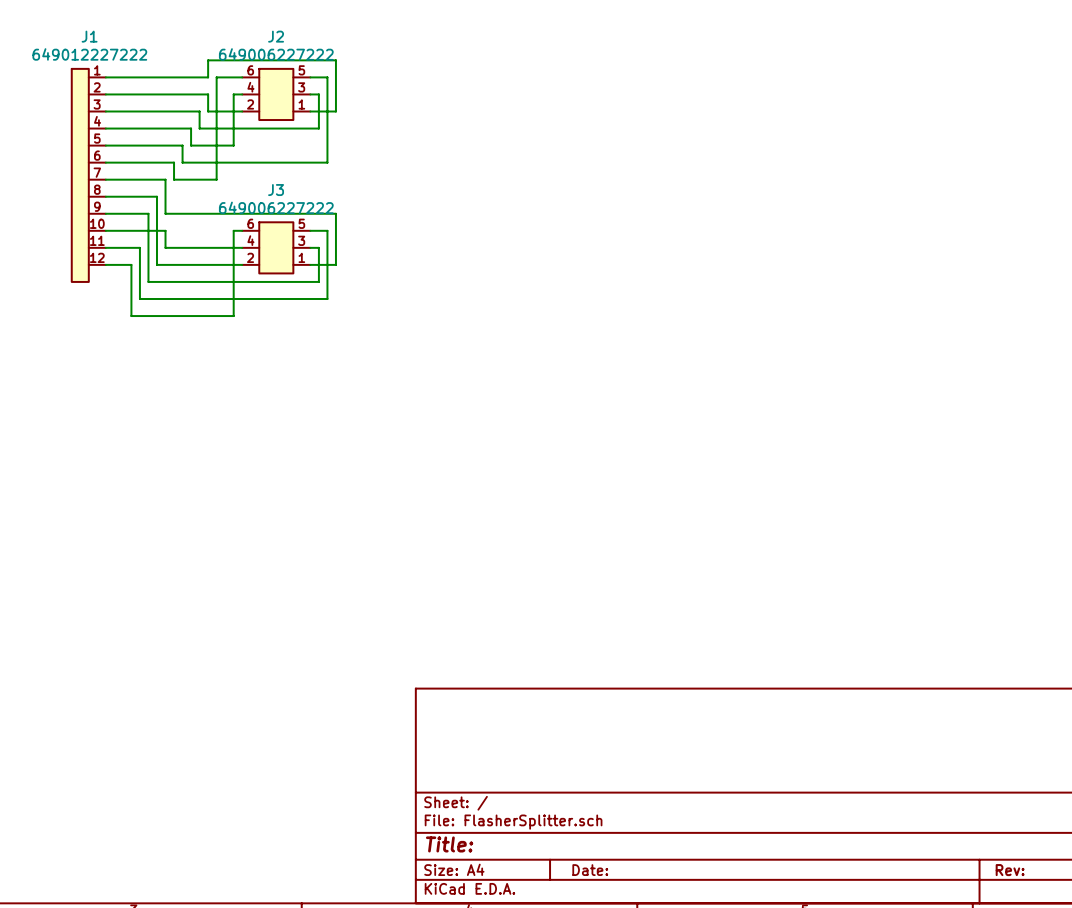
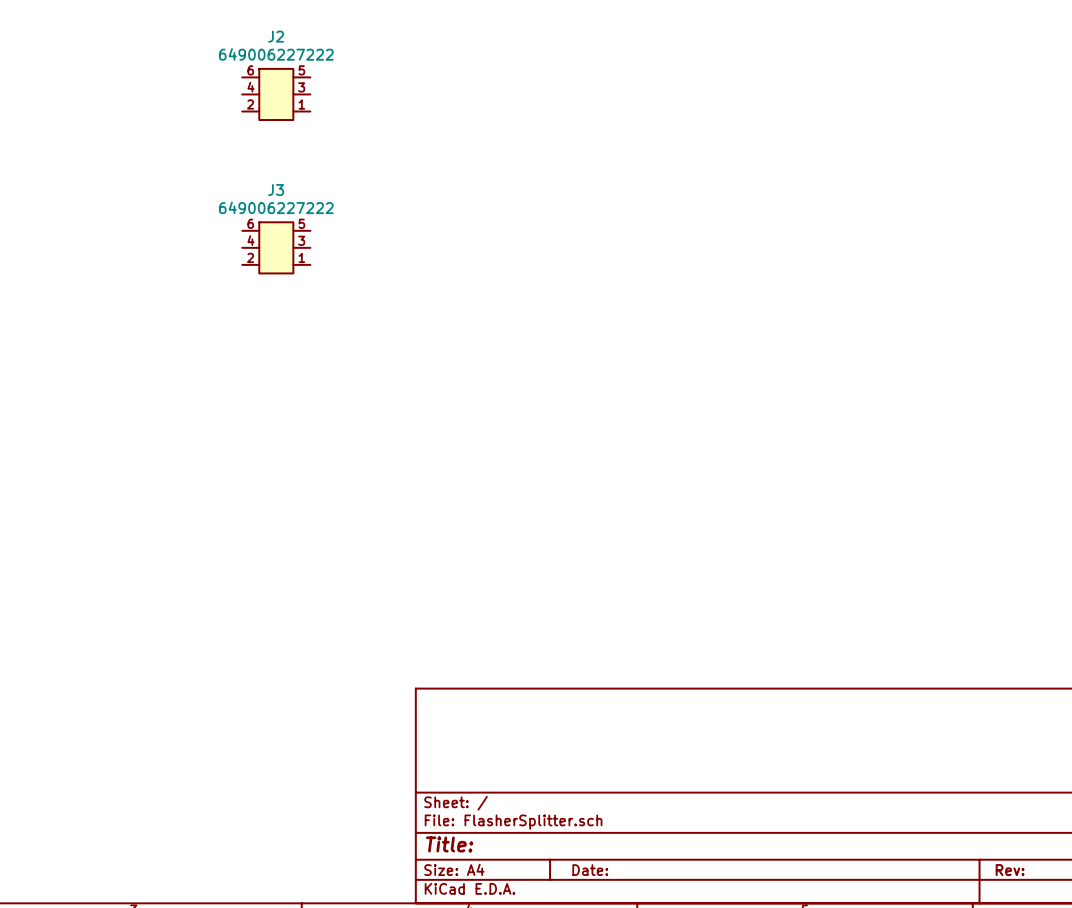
wire: (105, 77) (208, 77) (208, 60) (335, 60) (335, 111) (310, 111) -> none
wire: (242, 77) (216, 77) (216, 179) (174, 179) (174, 162) (105, 162) -> none
wire: (310, 77) (327, 77) (327, 162) (182, 162) (182, 145) (105, 145) -> none
wire: (105, 94) (208, 94) (208, 111) (242, 111) -> none
wire: (242, 94) (233, 94) (233, 145) (191, 145) (191, 128) (105, 128) -> none
wire: (310, 94) (318, 94) (318, 128) (199, 128) (199, 111) (105, 111) -> none
J1: 649012227222 (88, 175) -> none
wire: (105, 179) (165, 179) (165, 213) (335, 213) (335, 264) (310, 264) -> none
wire: (105, 196) (156, 196) (156, 264) (242, 264) -> none
wire: (105, 213) (148, 213) (148, 281) (318, 281) (318, 247) (310, 247) -> none
wire: (105, 230) (165, 230) (165, 247) (242, 247) -> none
wire: (242, 230) (233, 230) (233, 316) (131, 316) (131, 264) (105, 264) -> none
wire: (310, 230) (327, 230) (327, 298) (139, 298) (139, 247) (105, 247) -> none

